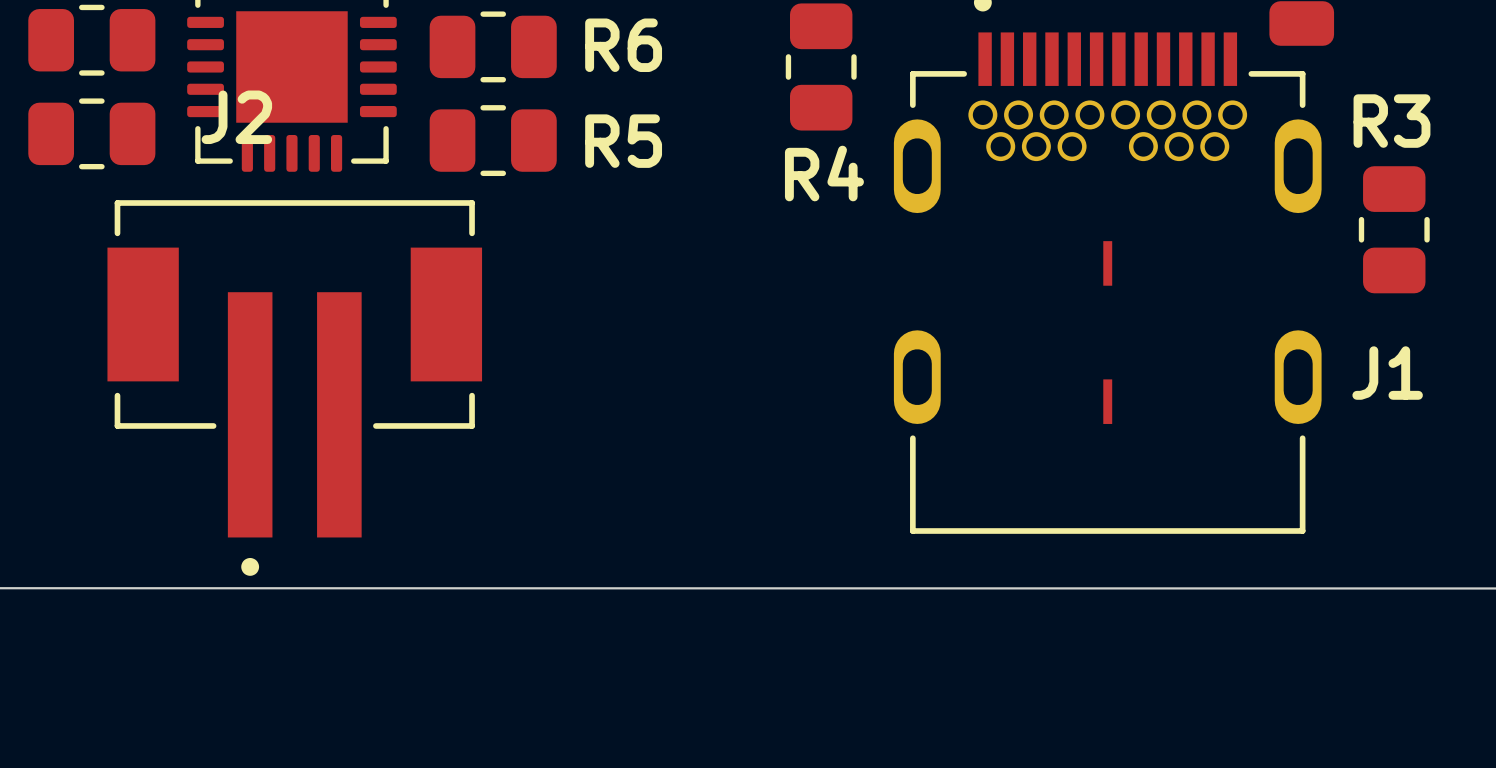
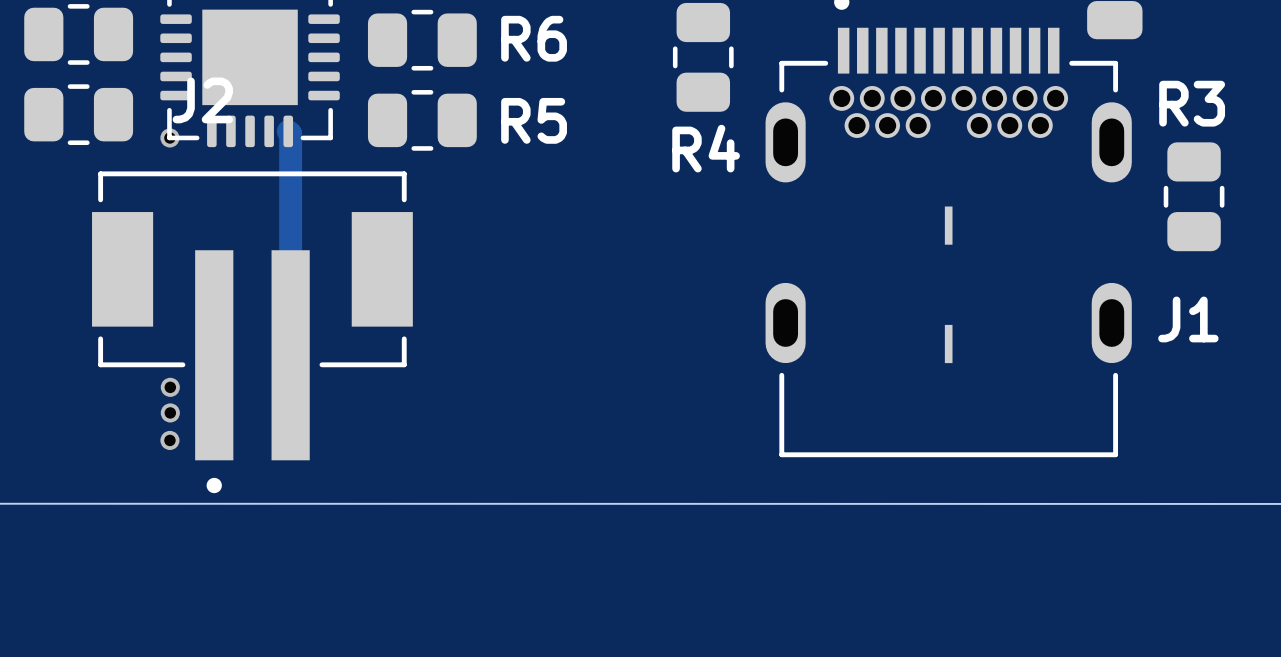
track: none -> (288, 131) (290, 133) (290, 355)
via: none -> (169, 137)
via: none -> (170, 387)
via: none -> (170, 412)
via: none -> (169, 440)

